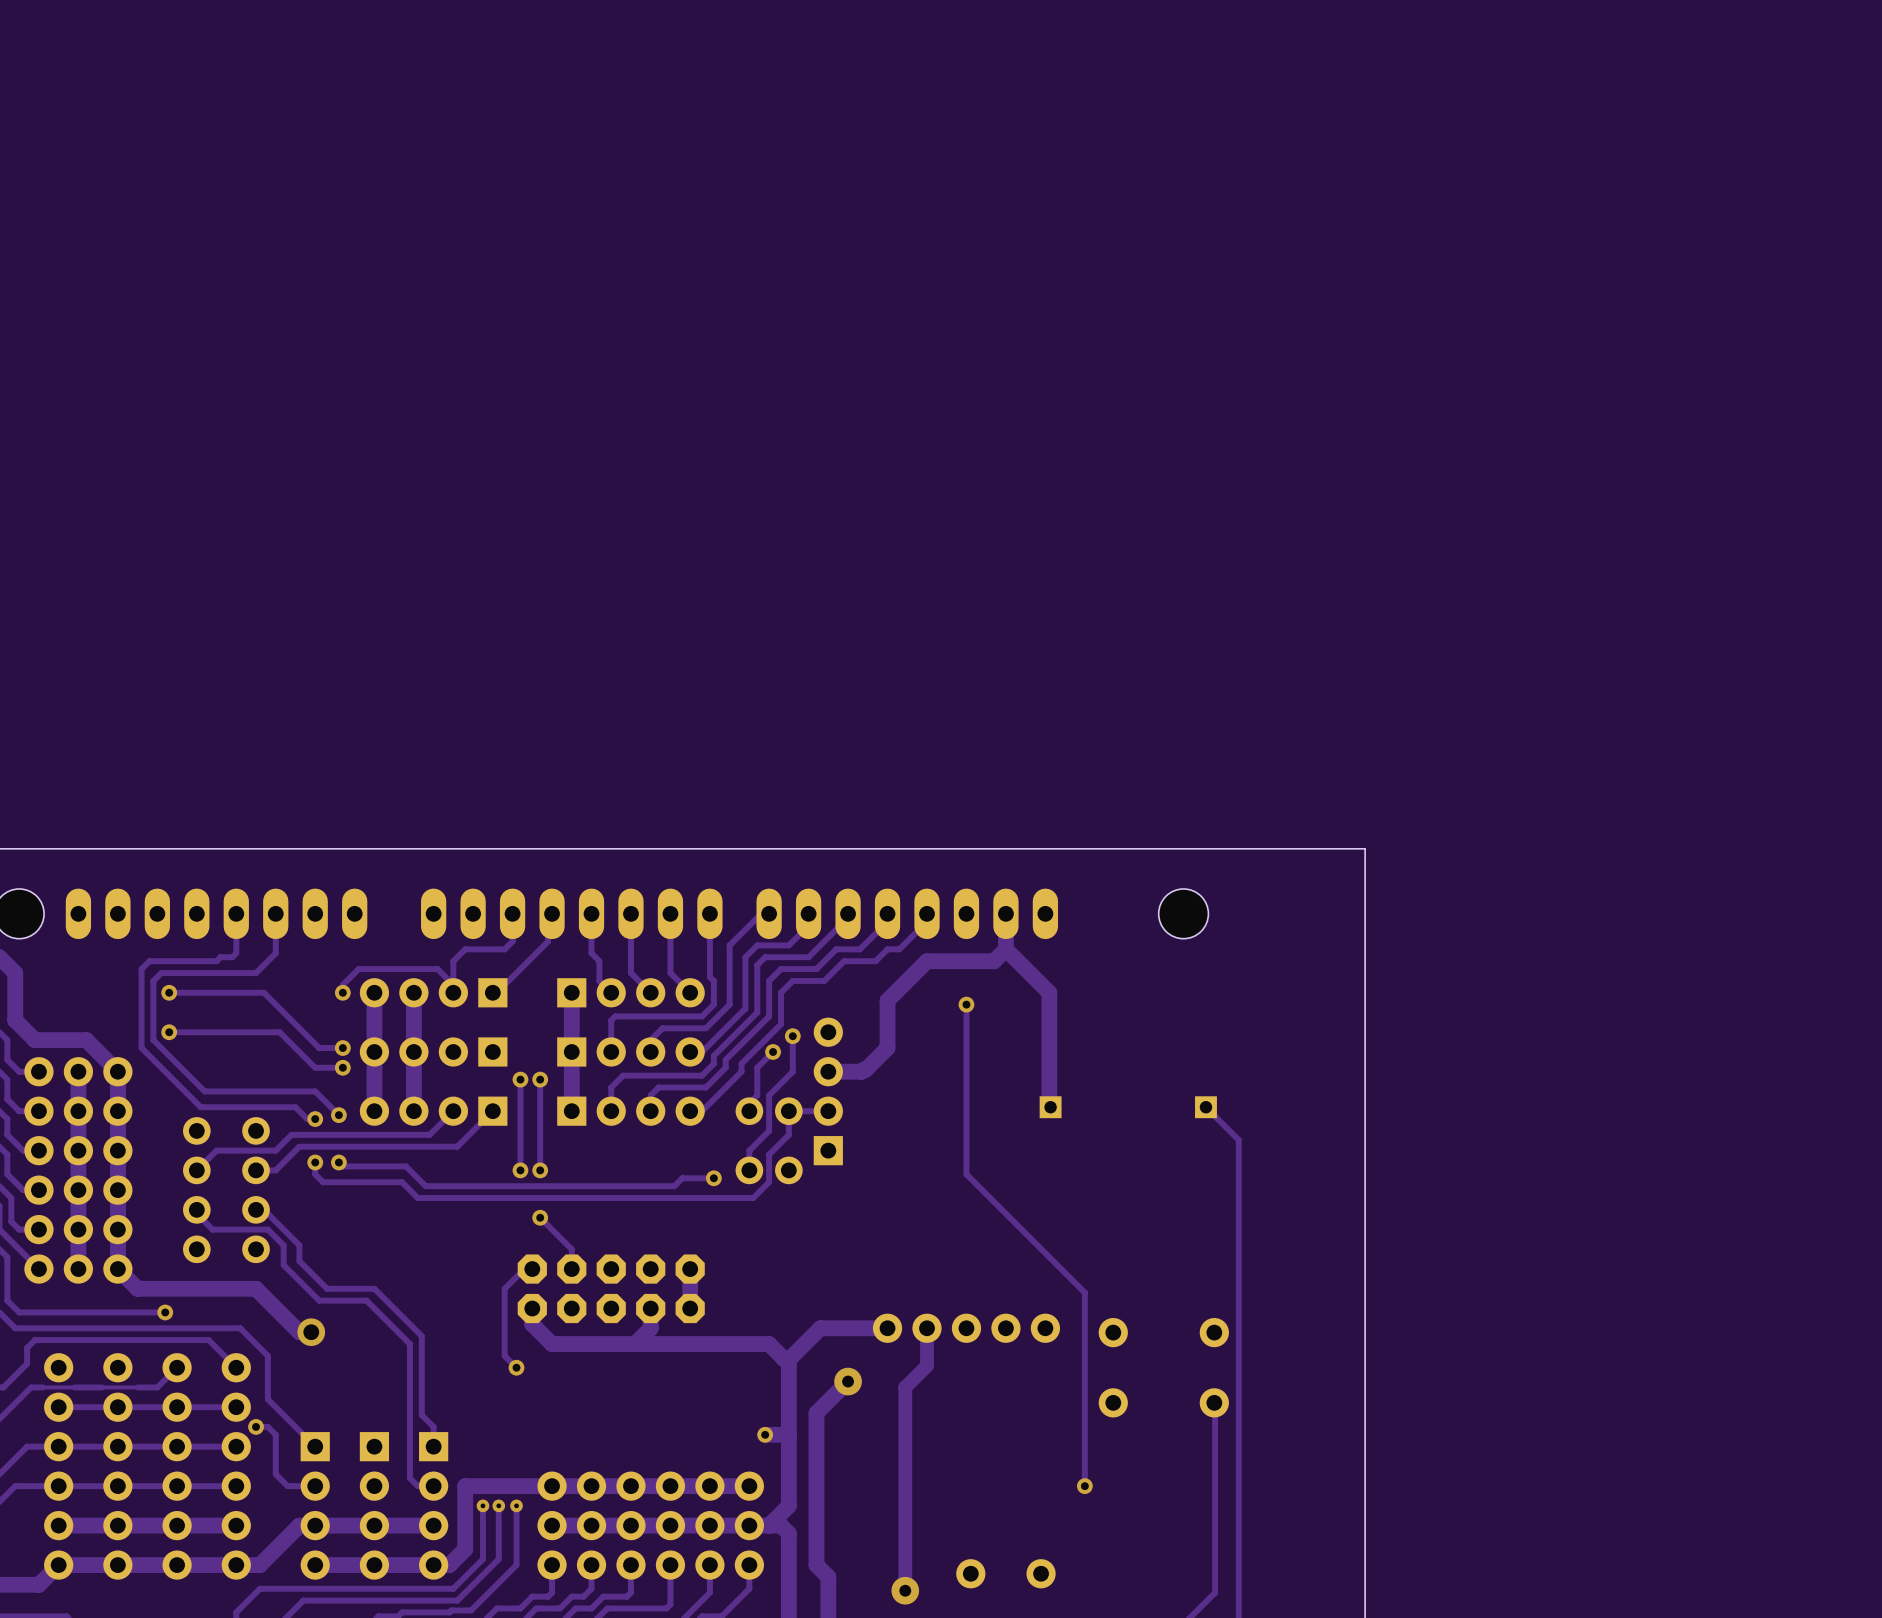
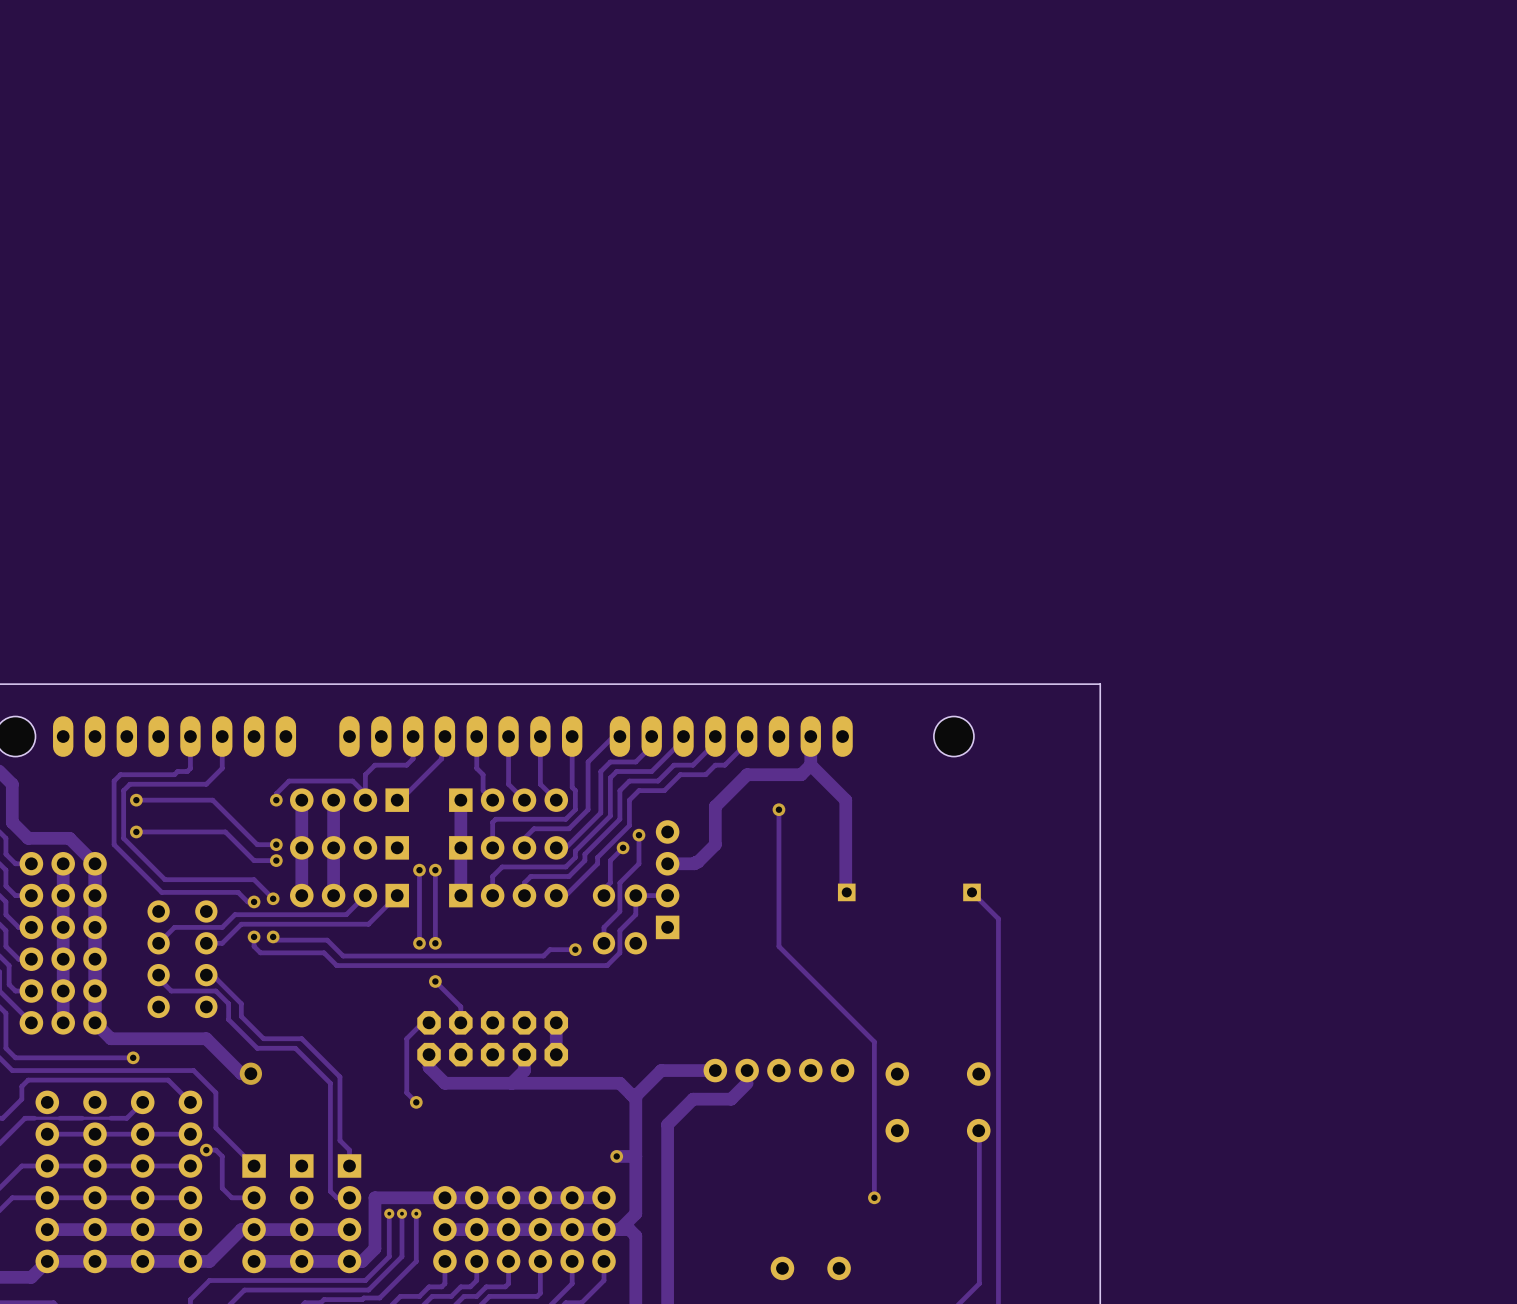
track: (927, 1344) (927, 1365) (905, 1387) (905, 1590) -> (747, 1083) (731, 1099) (693, 1099) (667, 1124) (667, 1270)
track: (848, 1381) (816, 1413) (816, 1565) (828, 1576) -> none
via: (848, 1381) -> none
via: (905, 1590) -> none

